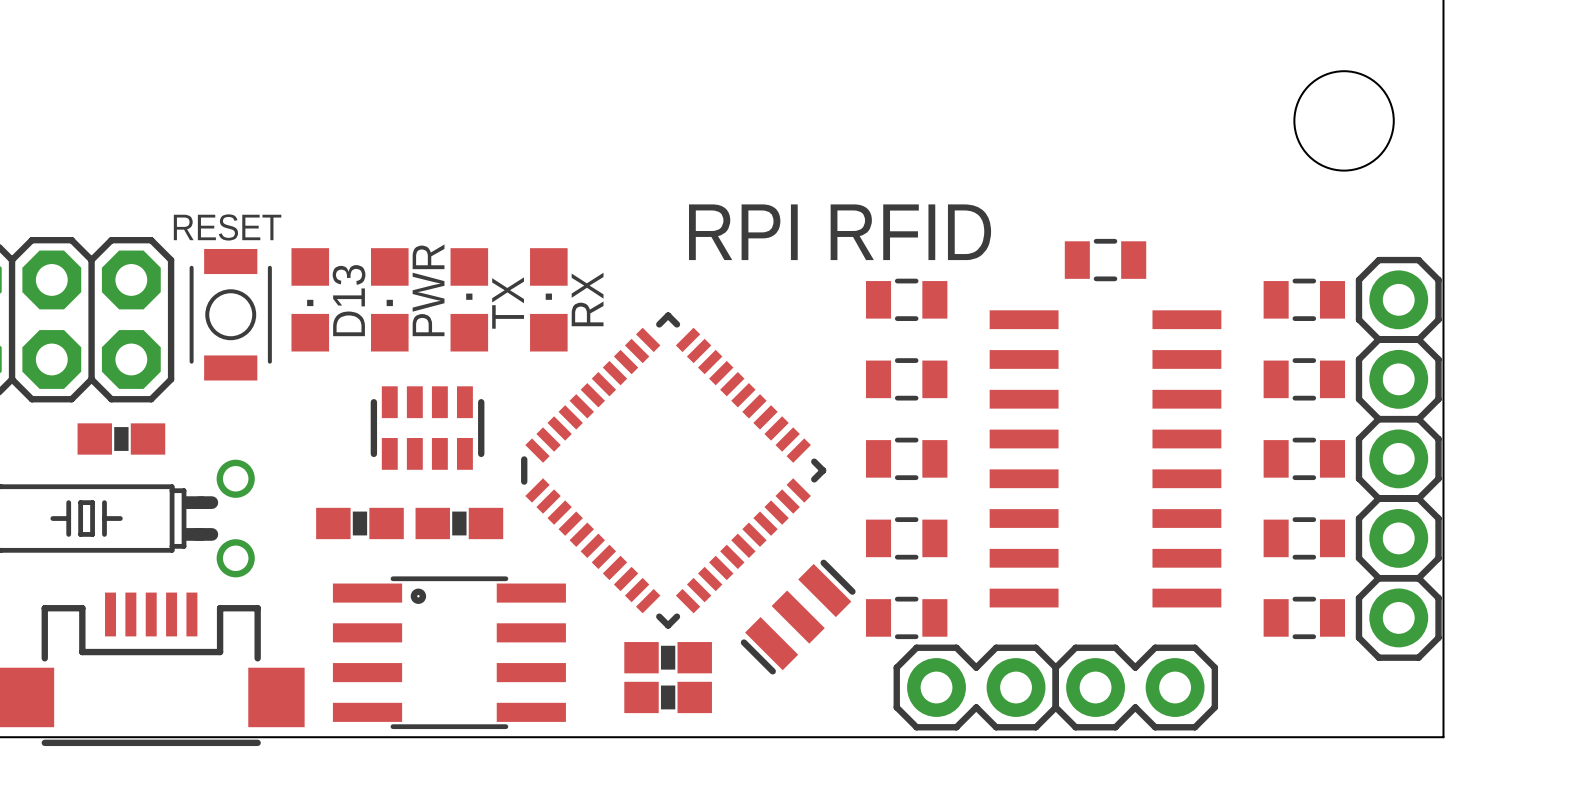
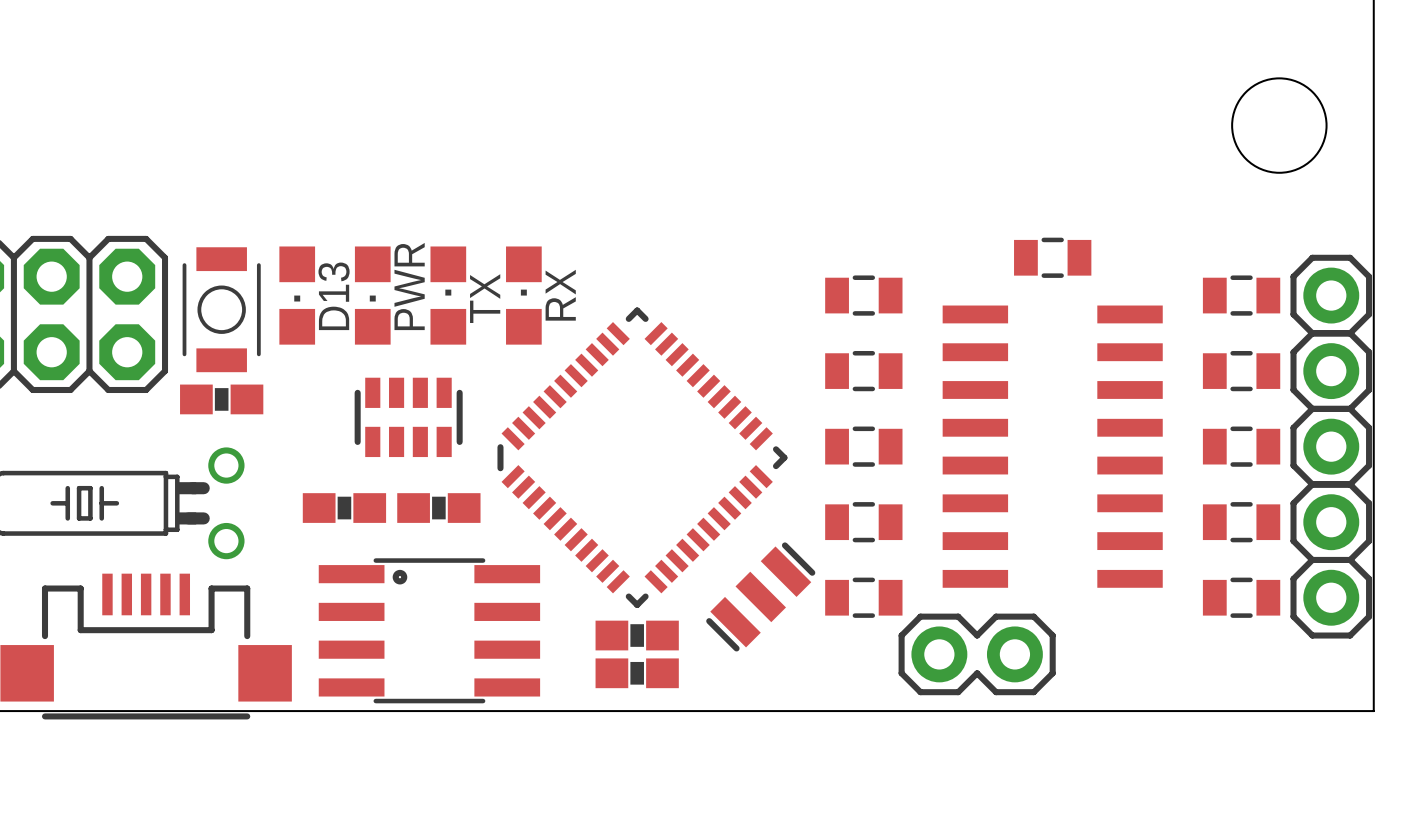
text: RESET (227, 227) -> none
text: RPI RFID (840, 232) -> none
part position: (121, 439) -> (221, 399)
part position: (976, 687) -> (977, 654)
part: (1135, 687) -> none

